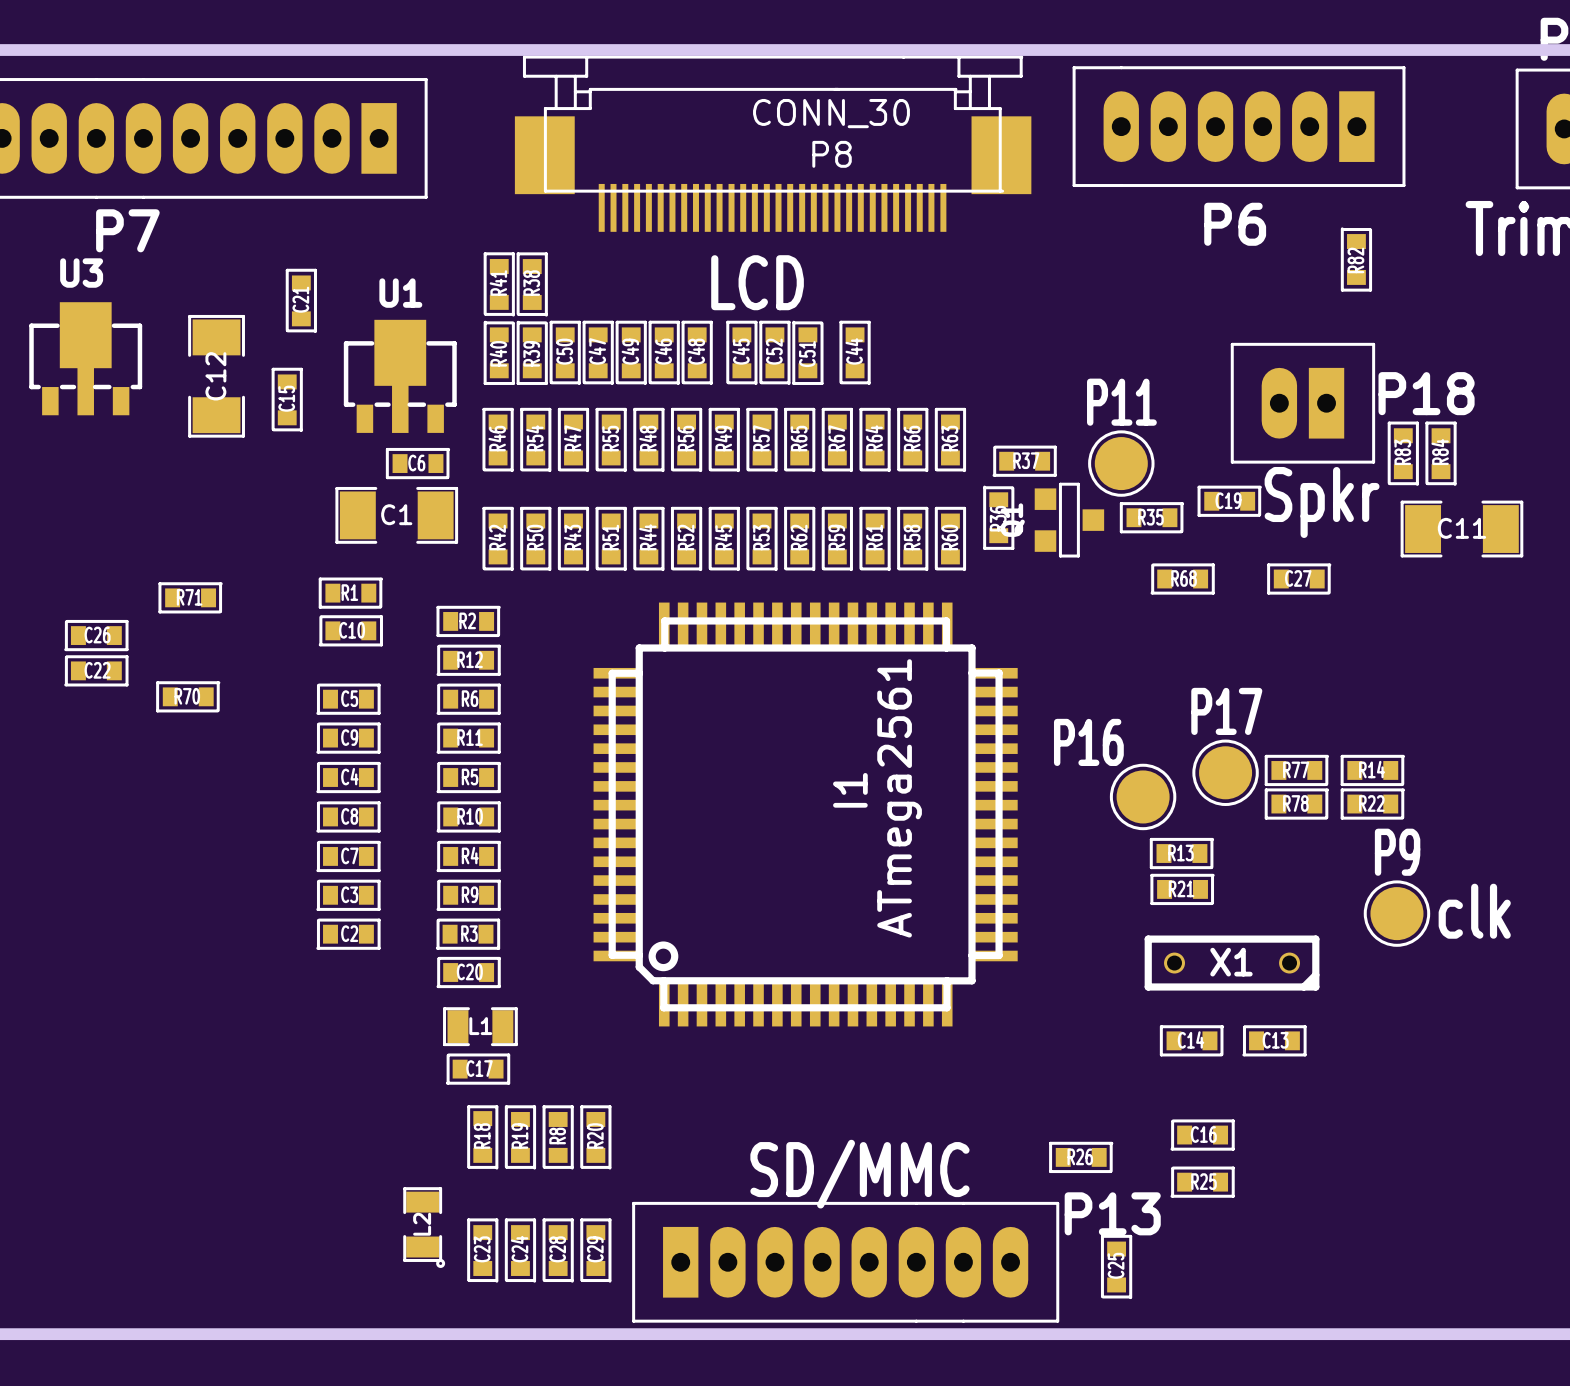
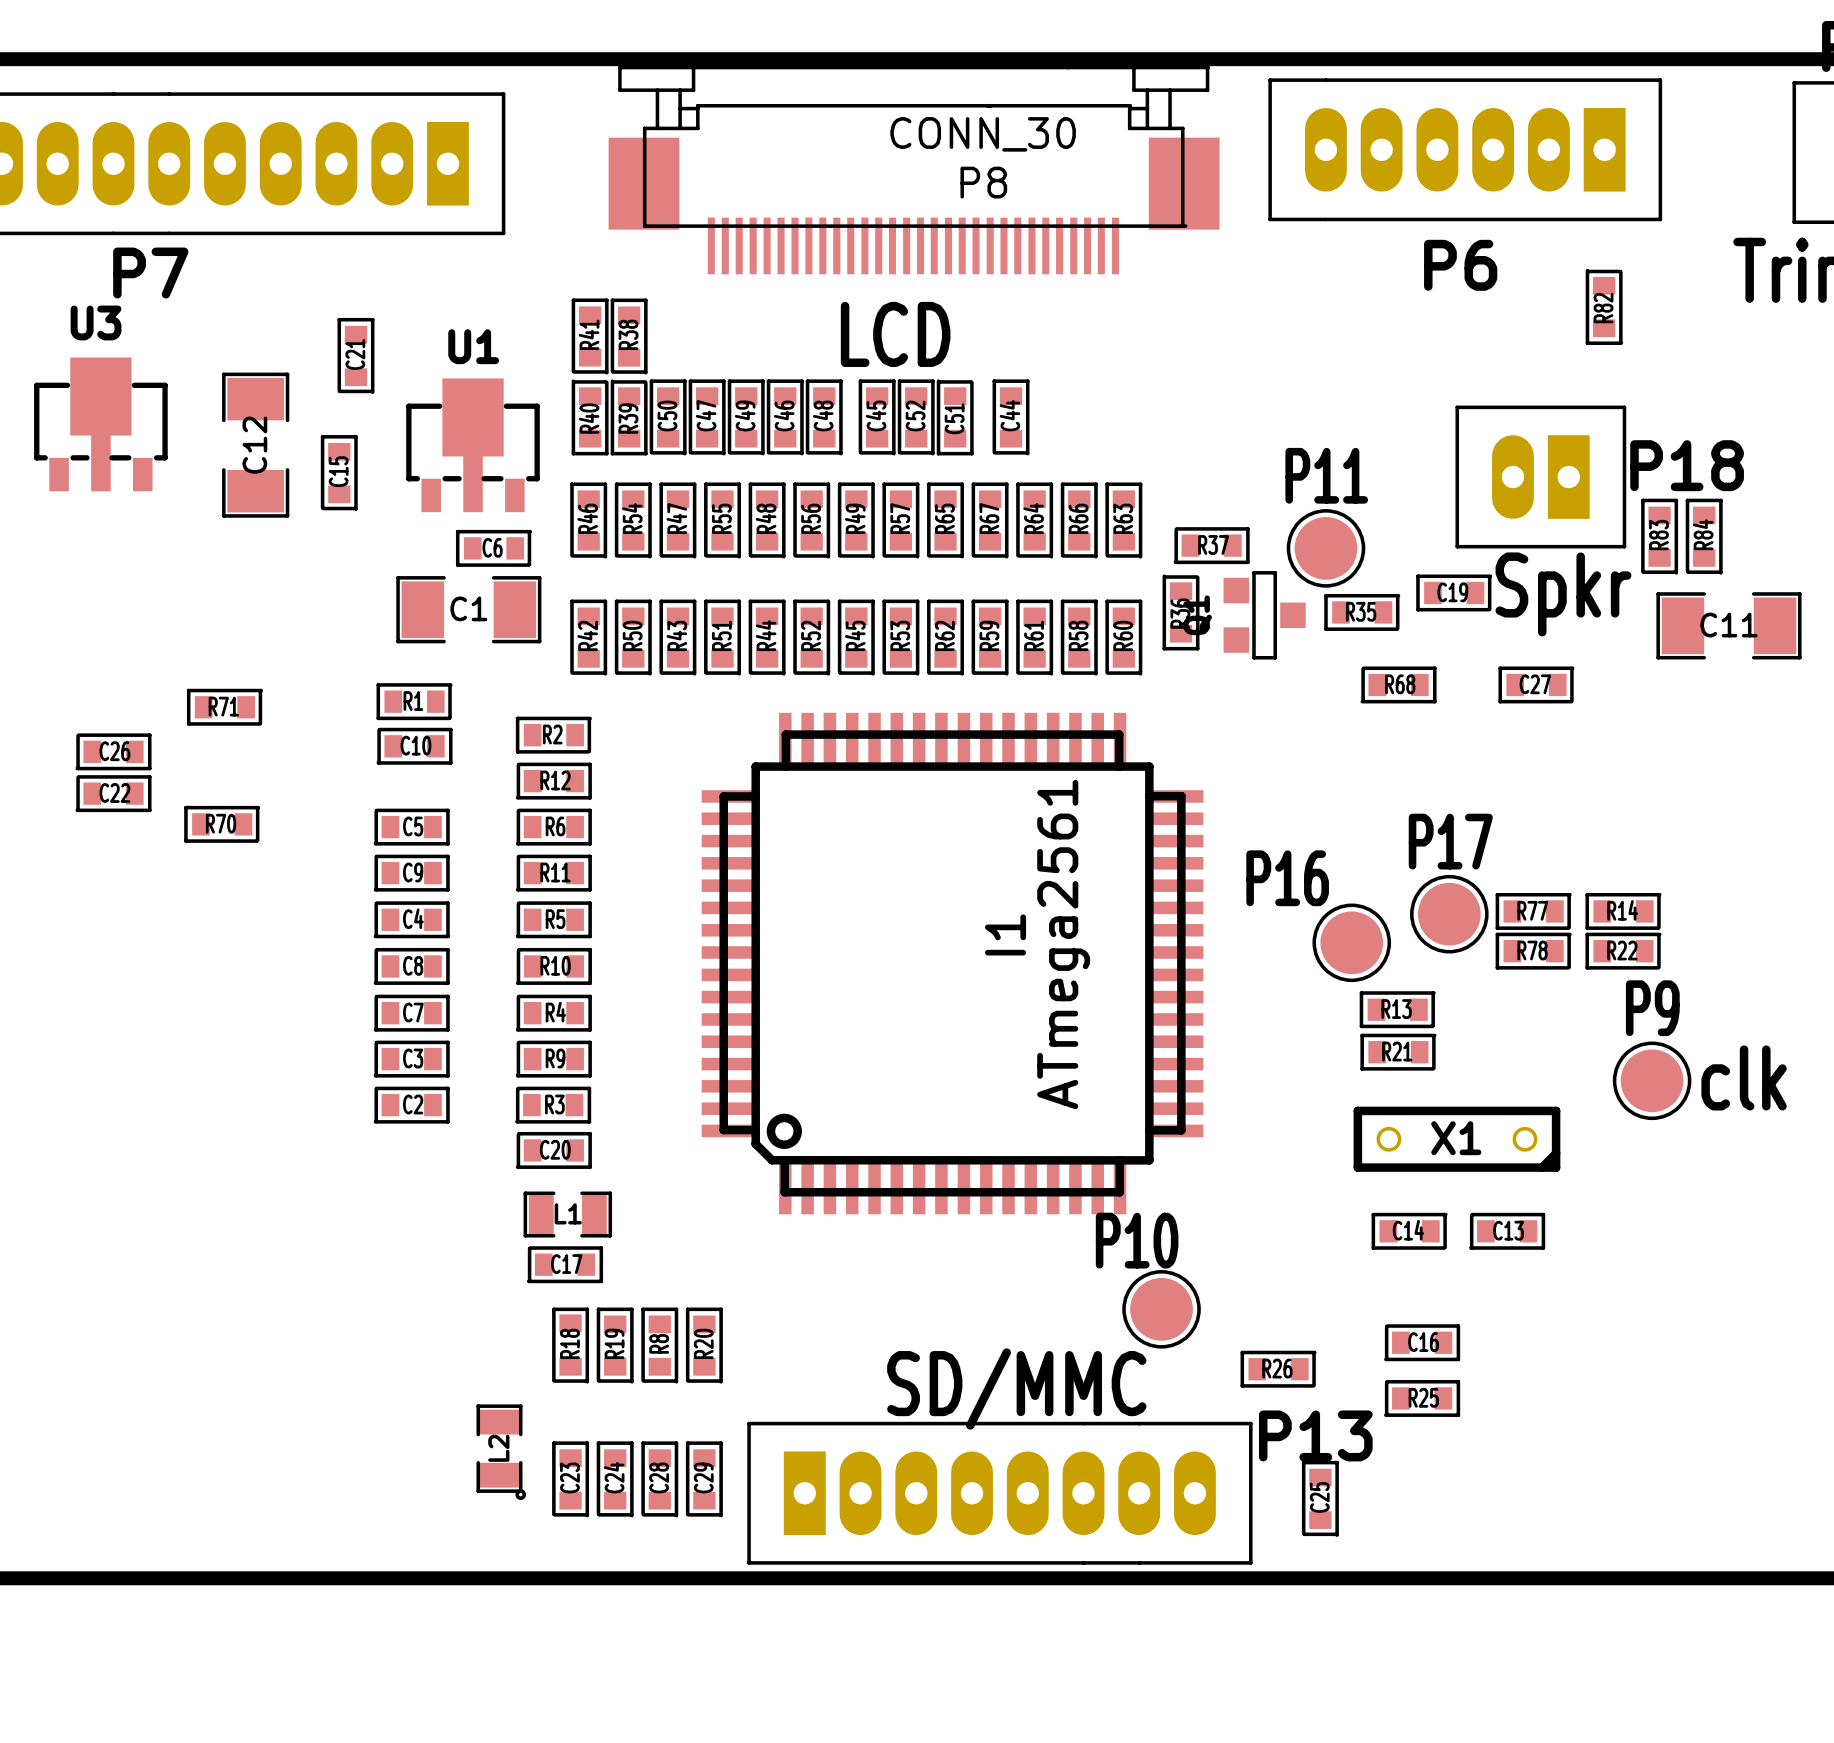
P10: none -> (1161, 1309)

